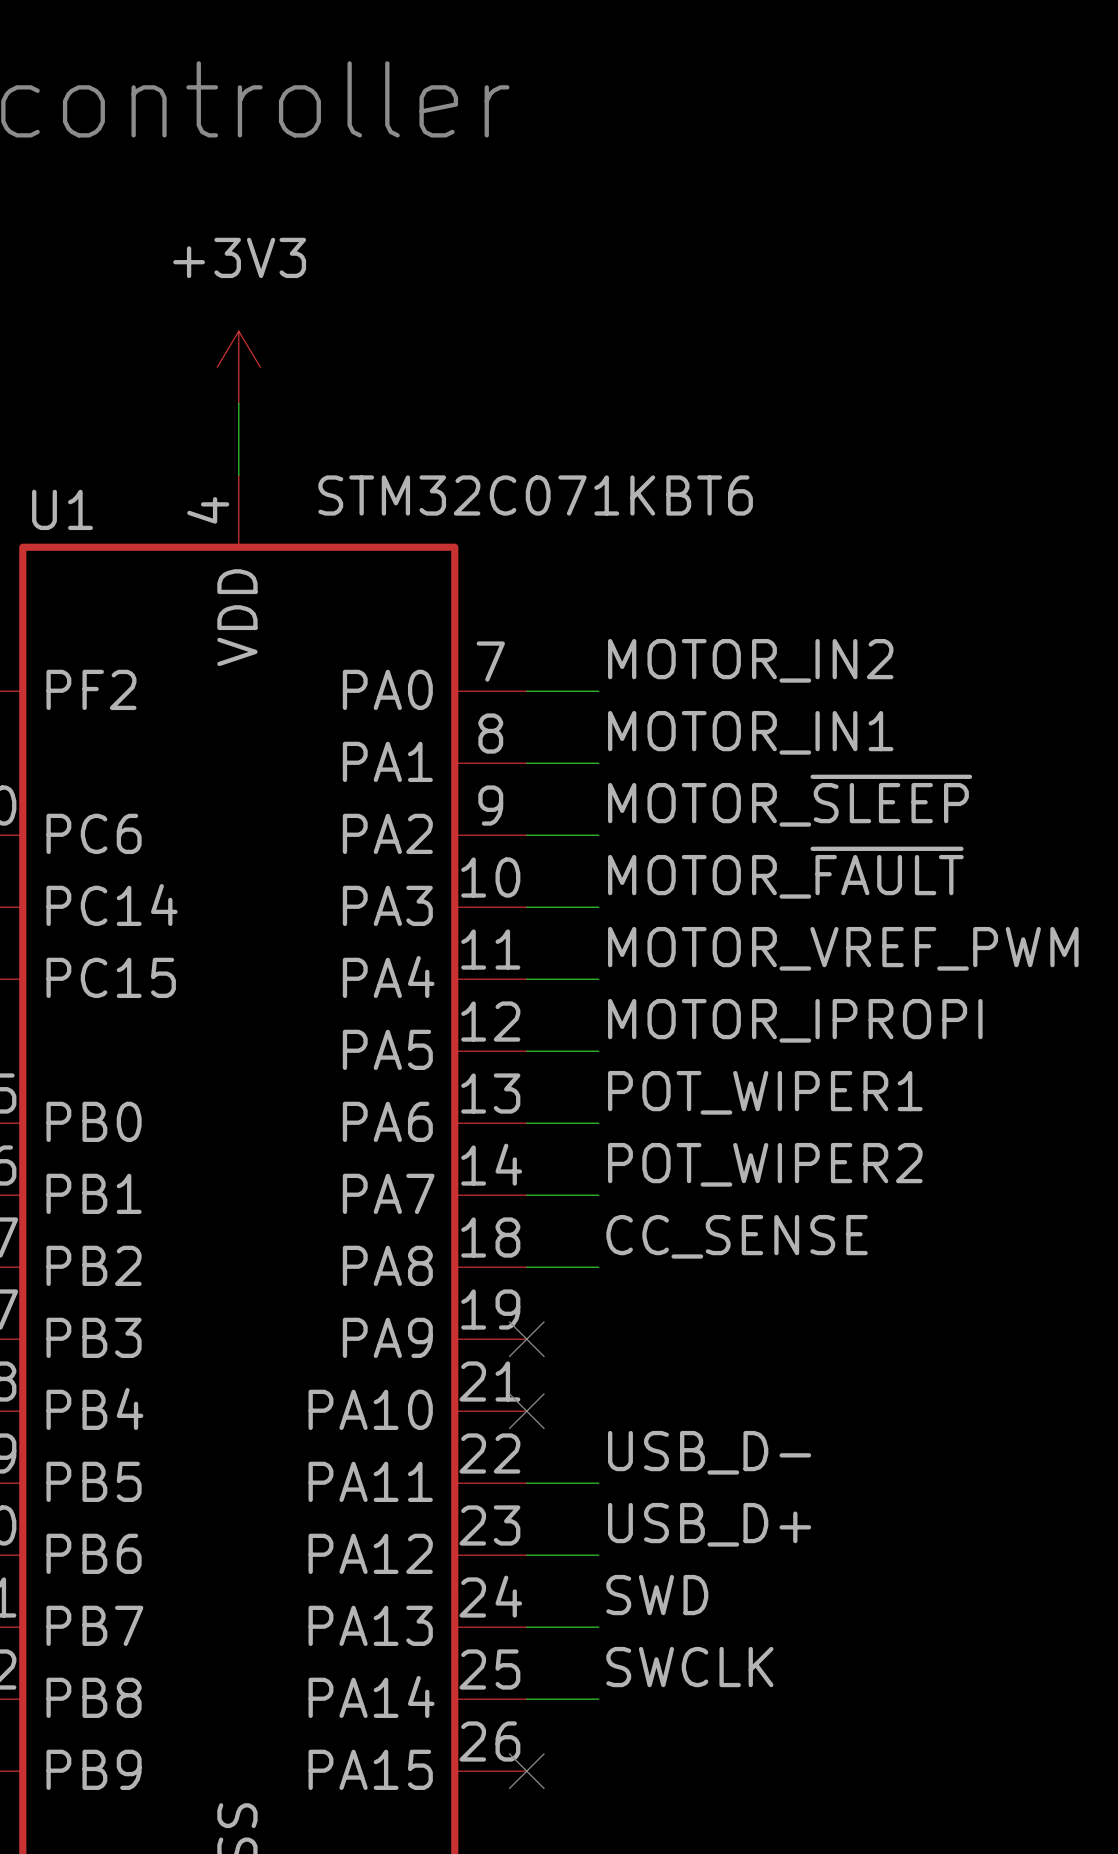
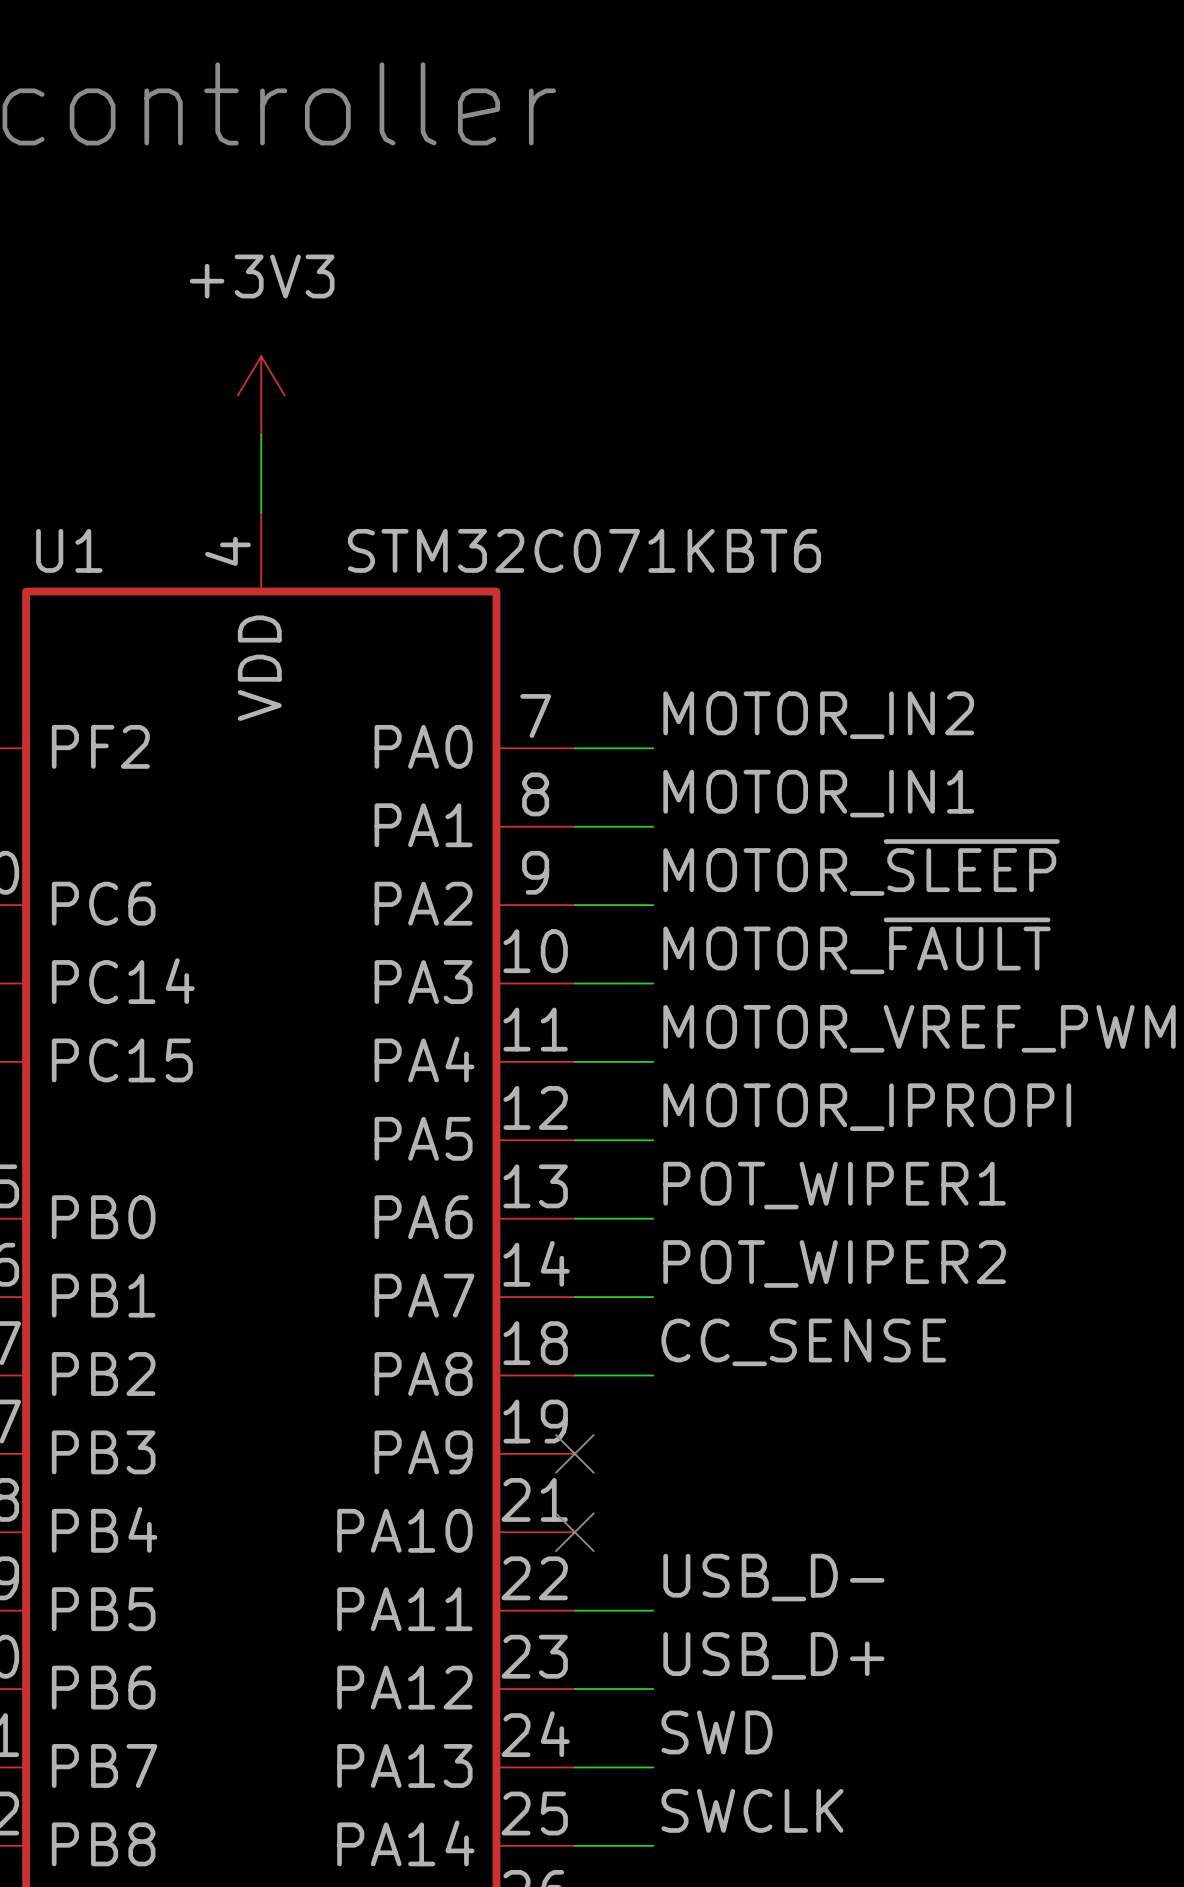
U1 value position: STM32C071KBT6 (535, 495) -> STM32C071KBT6 (584, 550)

